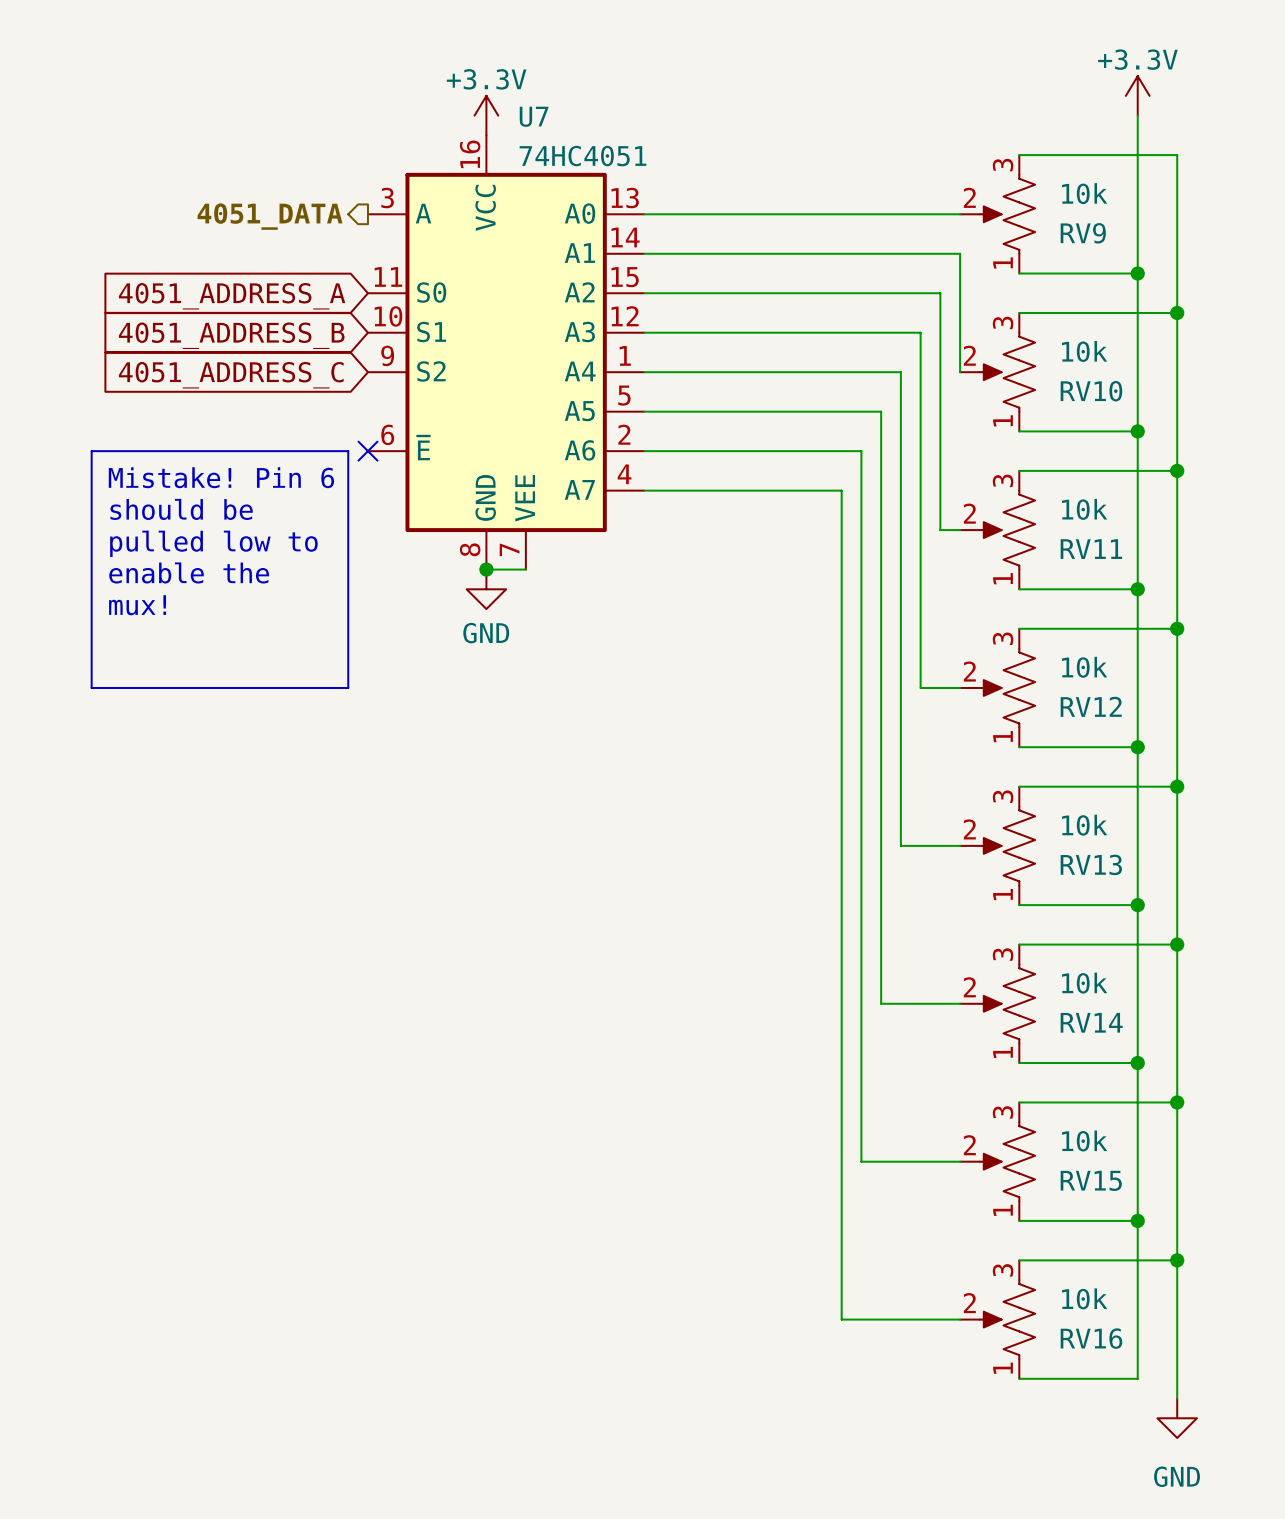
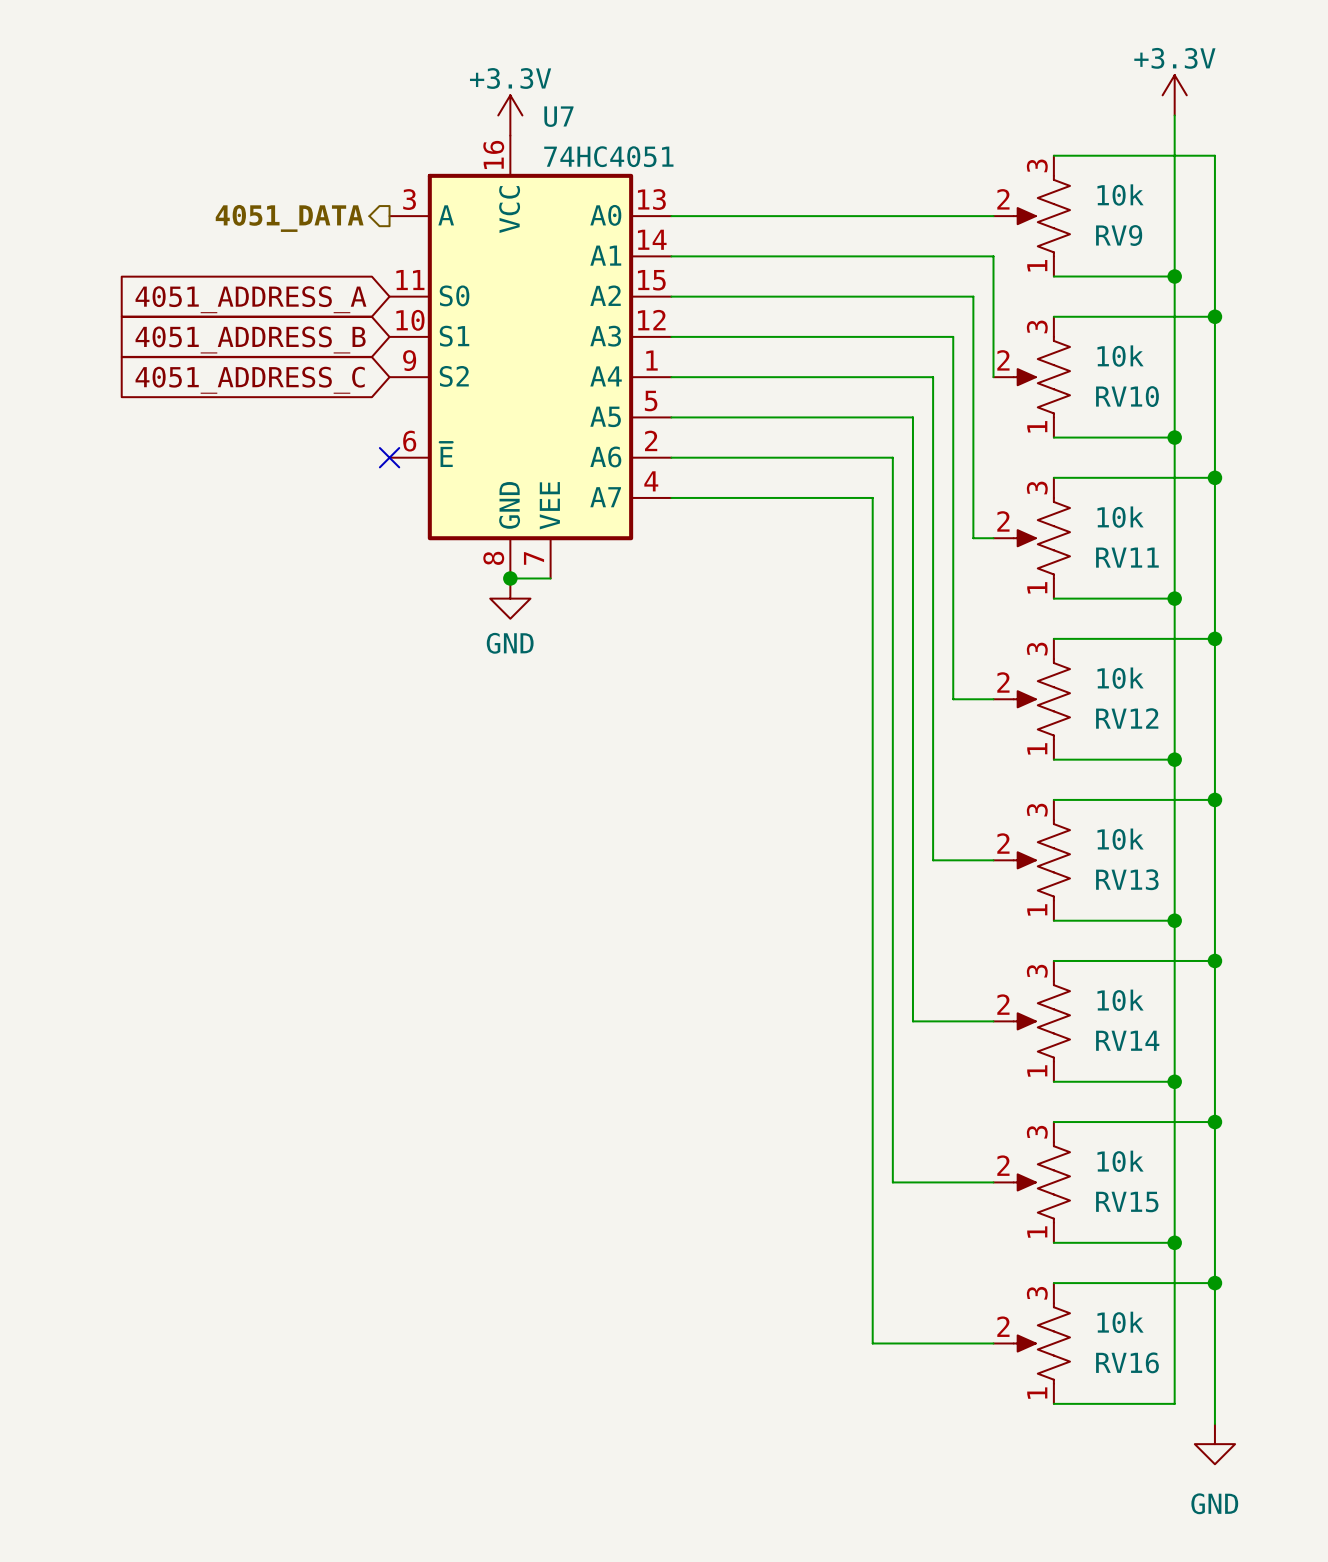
line: (91, 451) (348, 451) (348, 687) (91, 687) (91, 451) -> none
text: Mistake! Pin 6 (221, 477) -> none
text: should be (181, 509) -> none
text: pulled low to (213, 543) -> none
text: enable the (189, 572) -> none
text: mux! (137, 605) -> none

